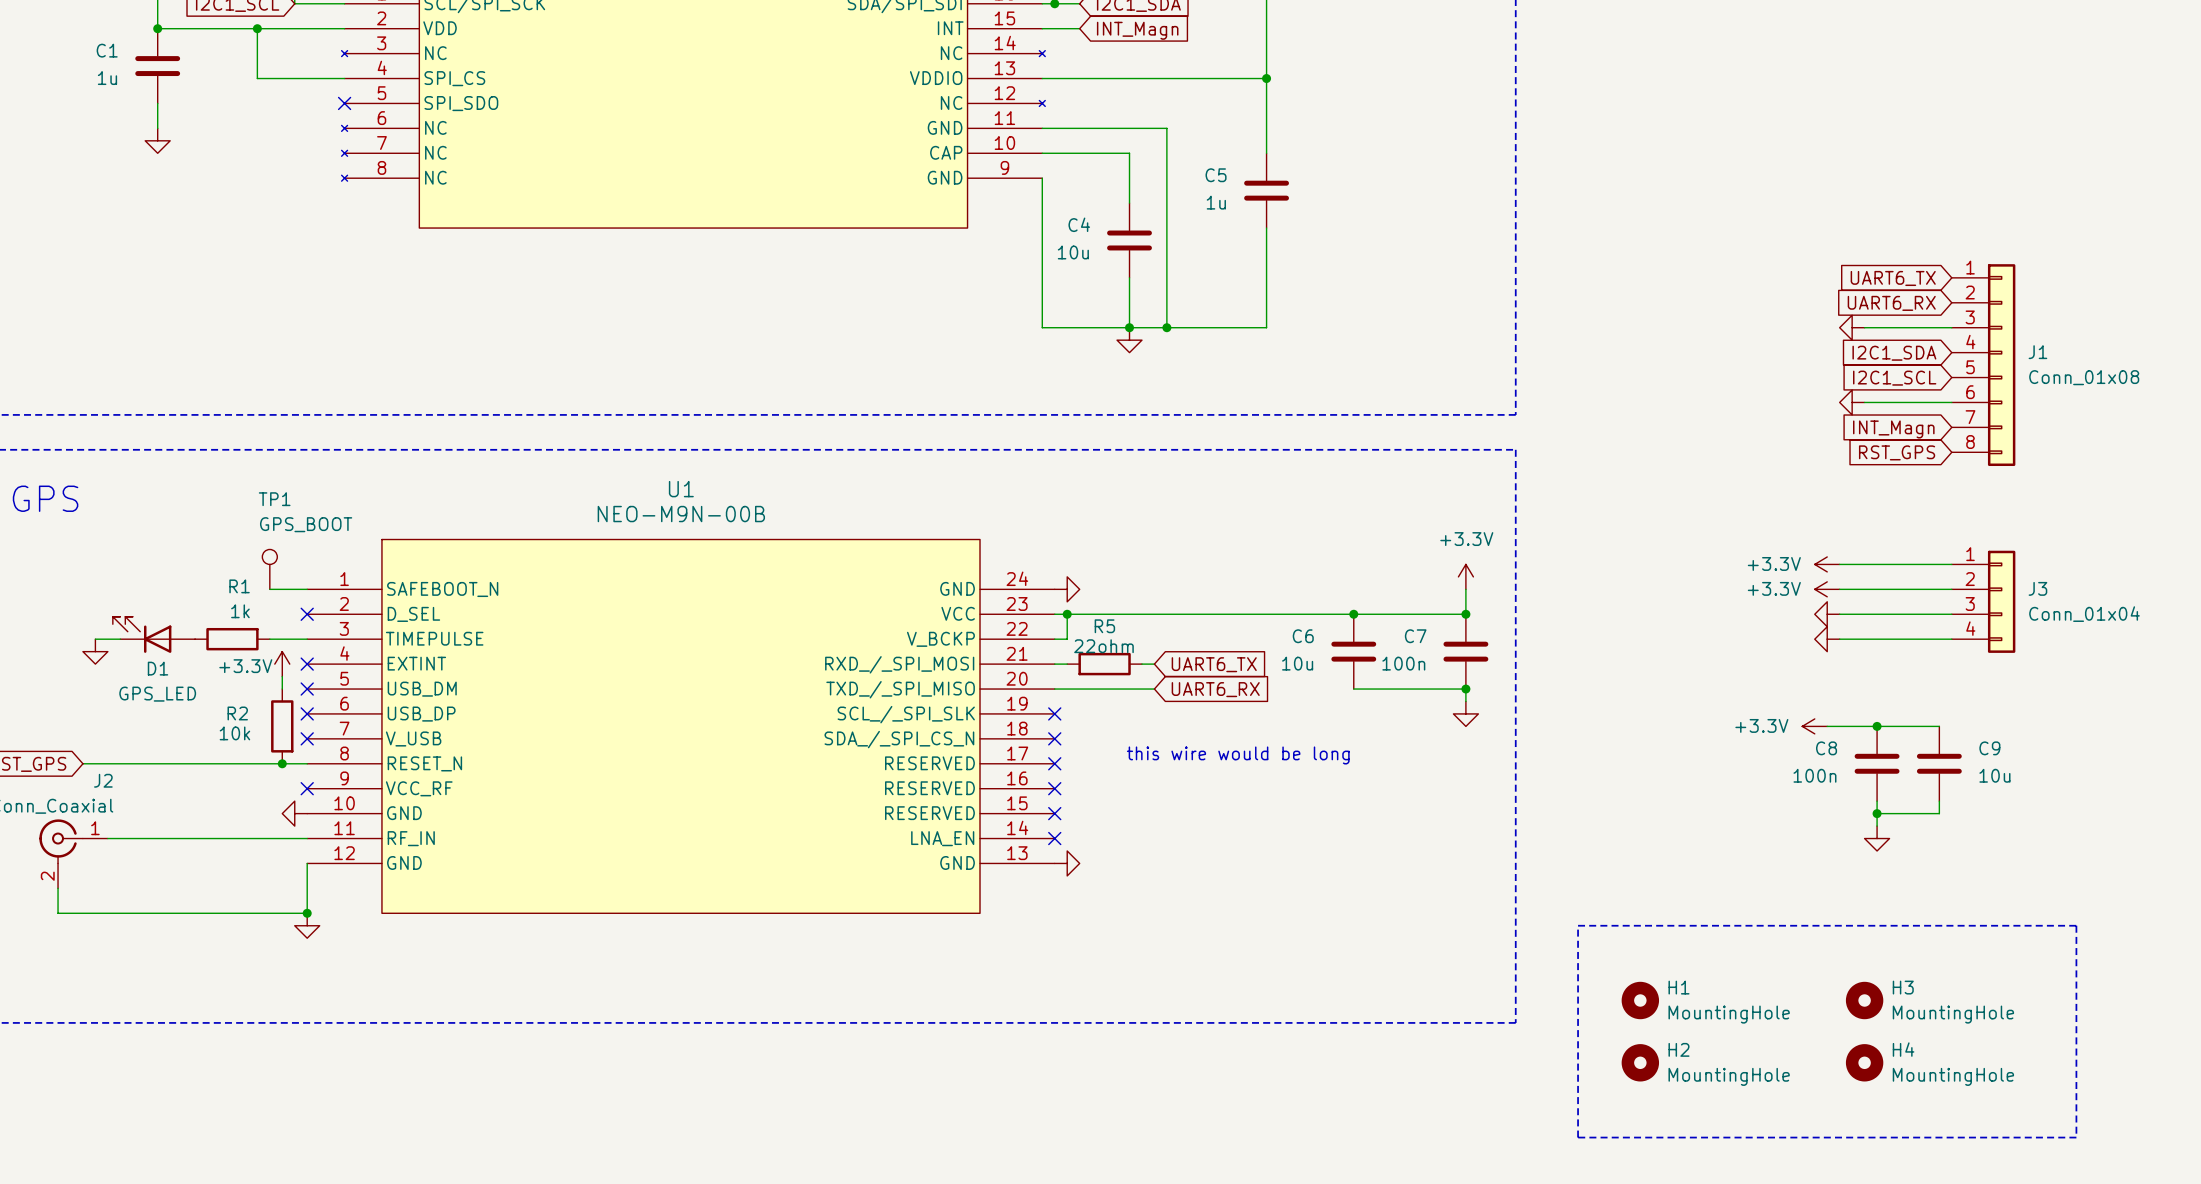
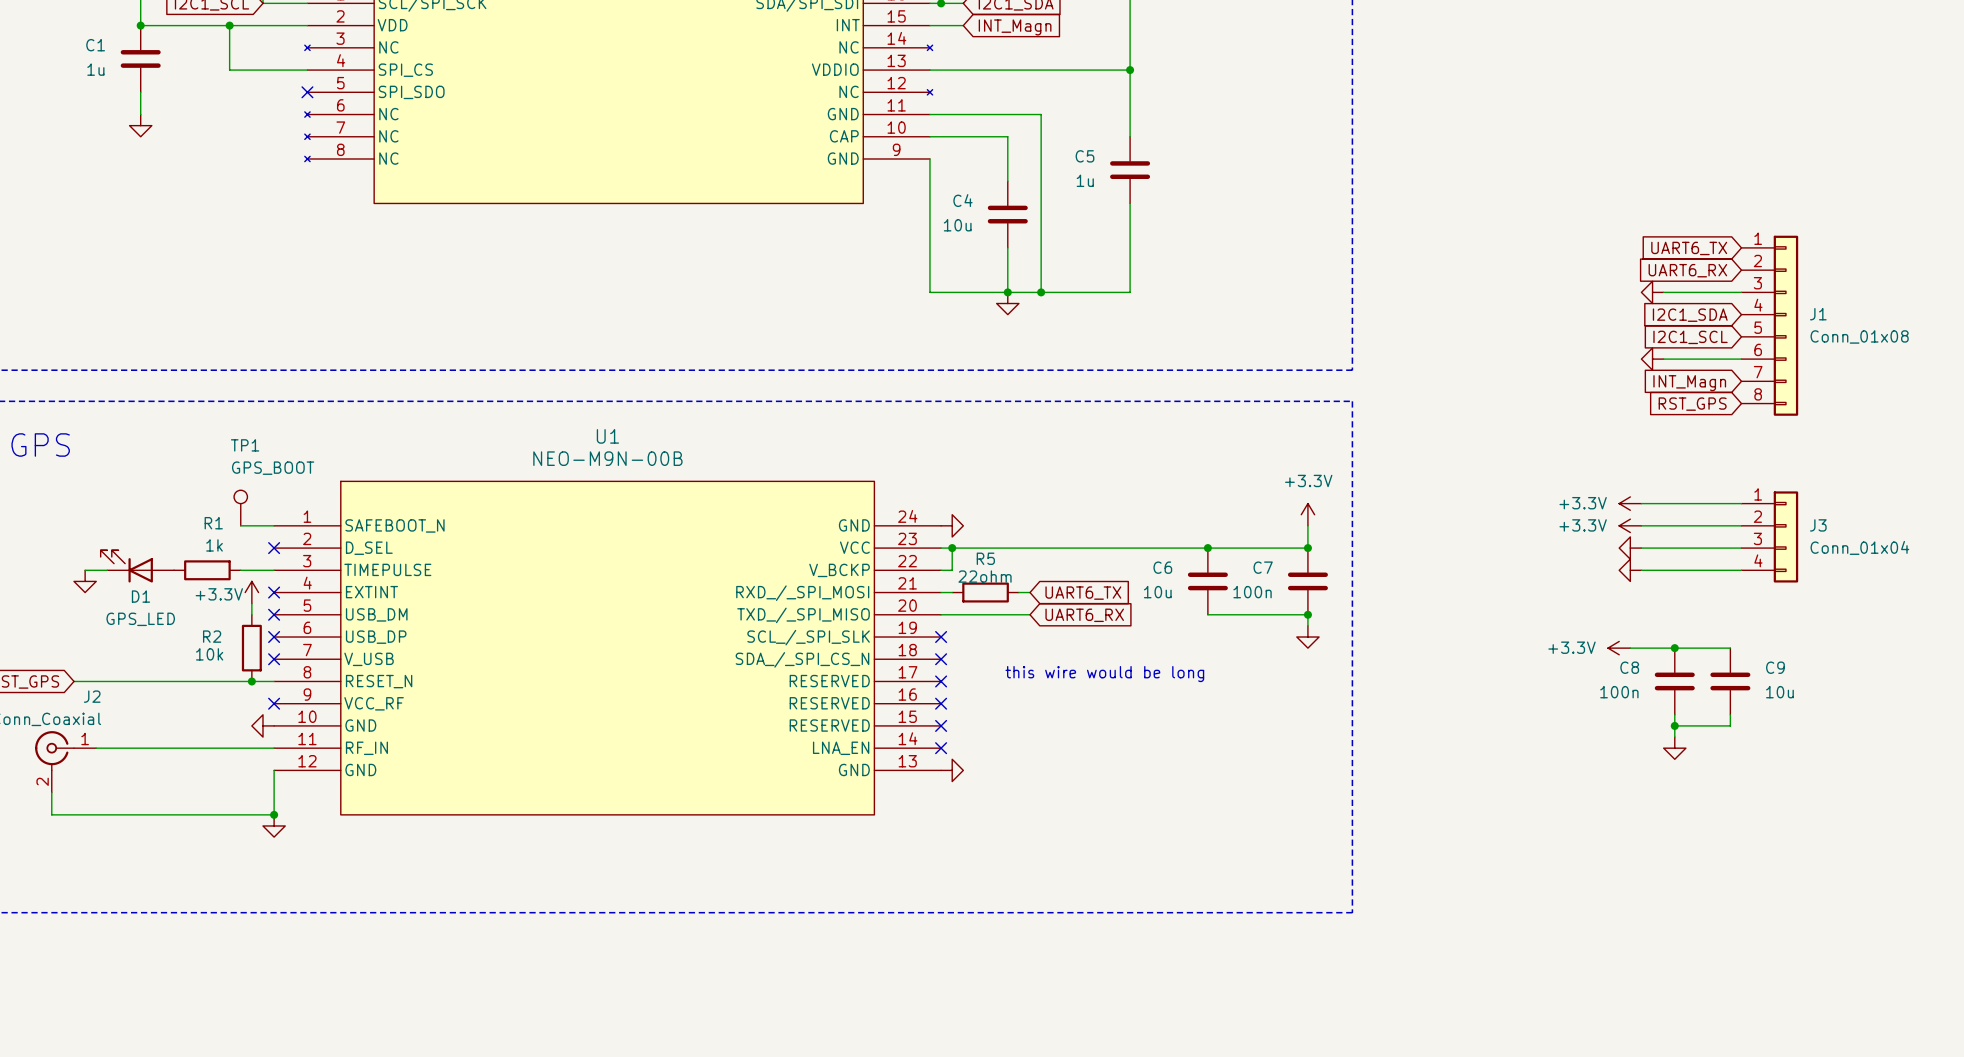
line: (1578, 925) (2076, 925) (2076, 1137) (1578, 1137) (1578, 925) -> none
H1: MountingHole (1640, 1000) -> none
H3: MountingHole (1864, 1000) -> none
H2: MountingHole (1640, 1062) -> none
H4: MountingHole (1864, 1062) -> none

